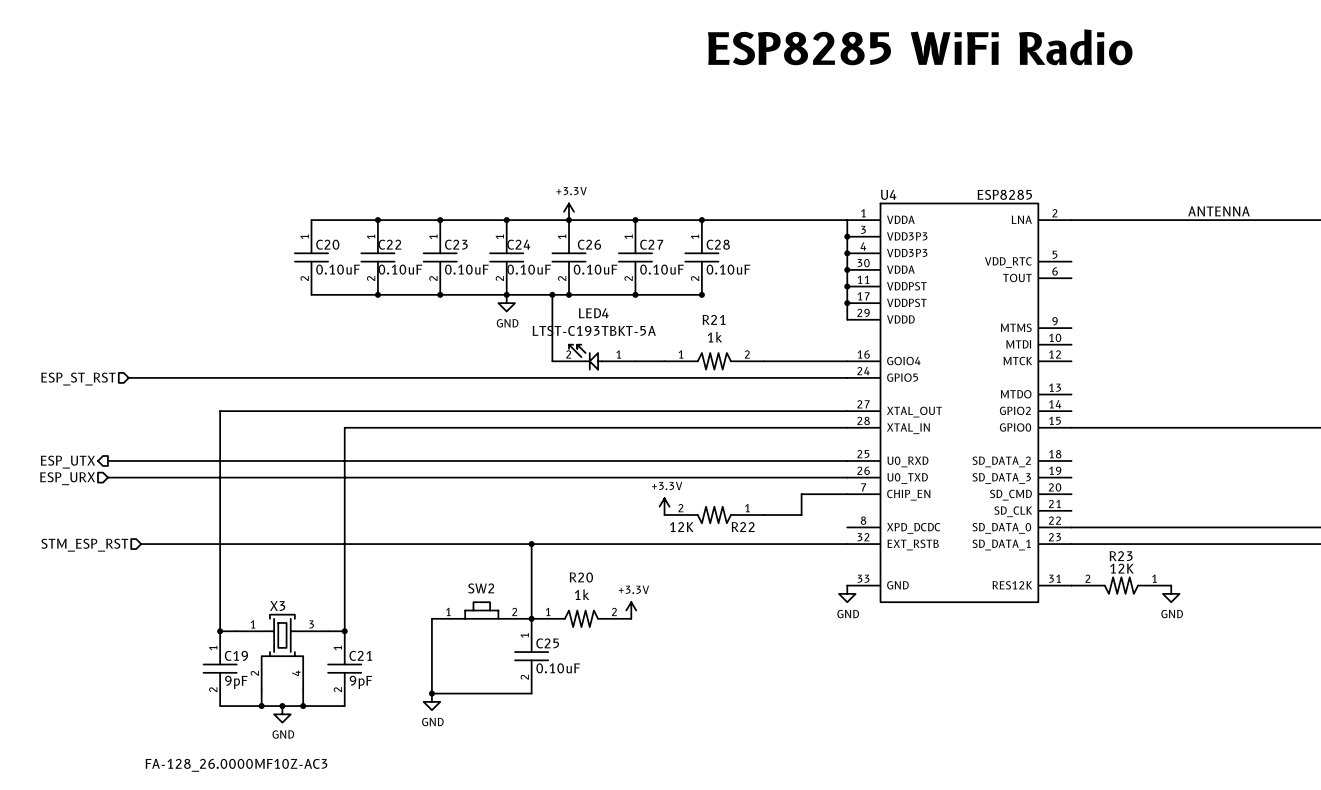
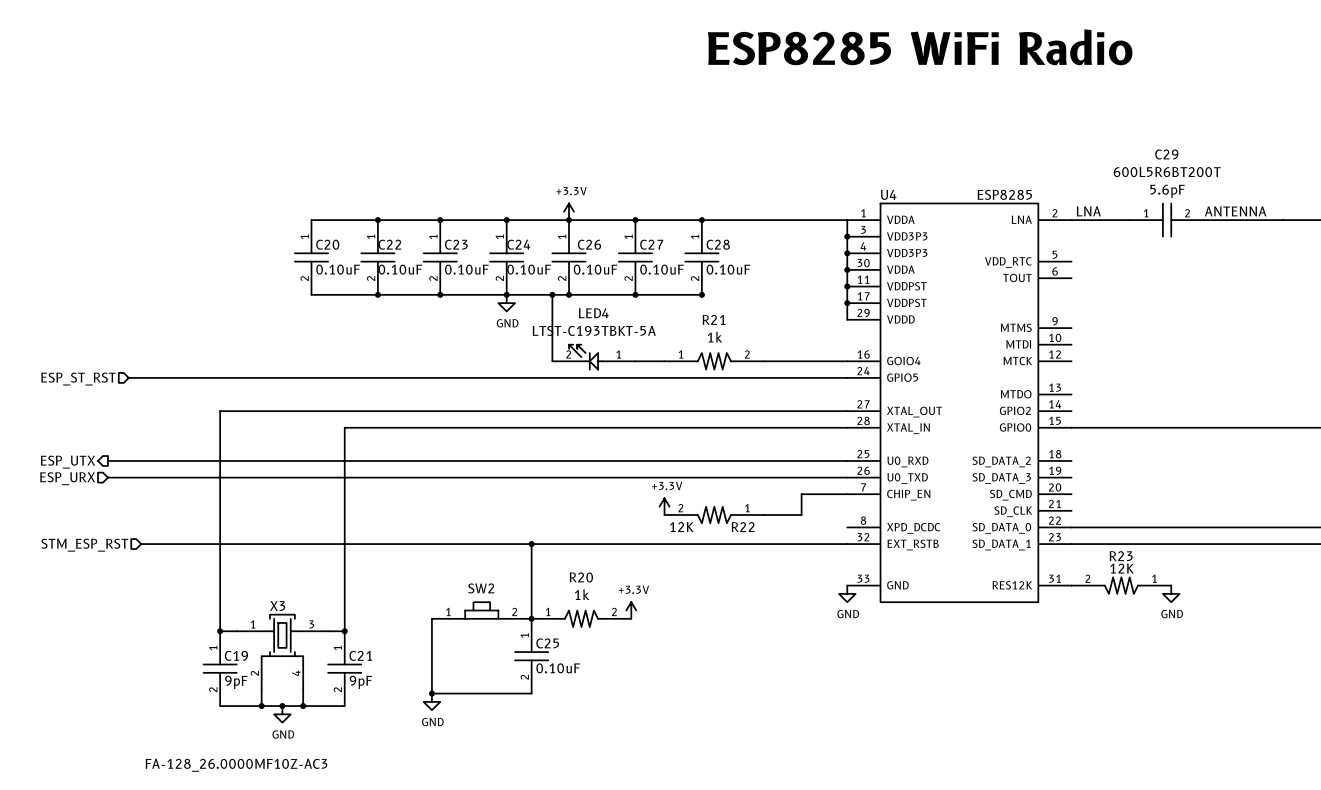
label: none -> LNA (1088, 211)
label position: ANTENNA (1218, 211) -> ANTENNA (1235, 211)
C29: none -> 600L5R6BT200T (1167, 220)

